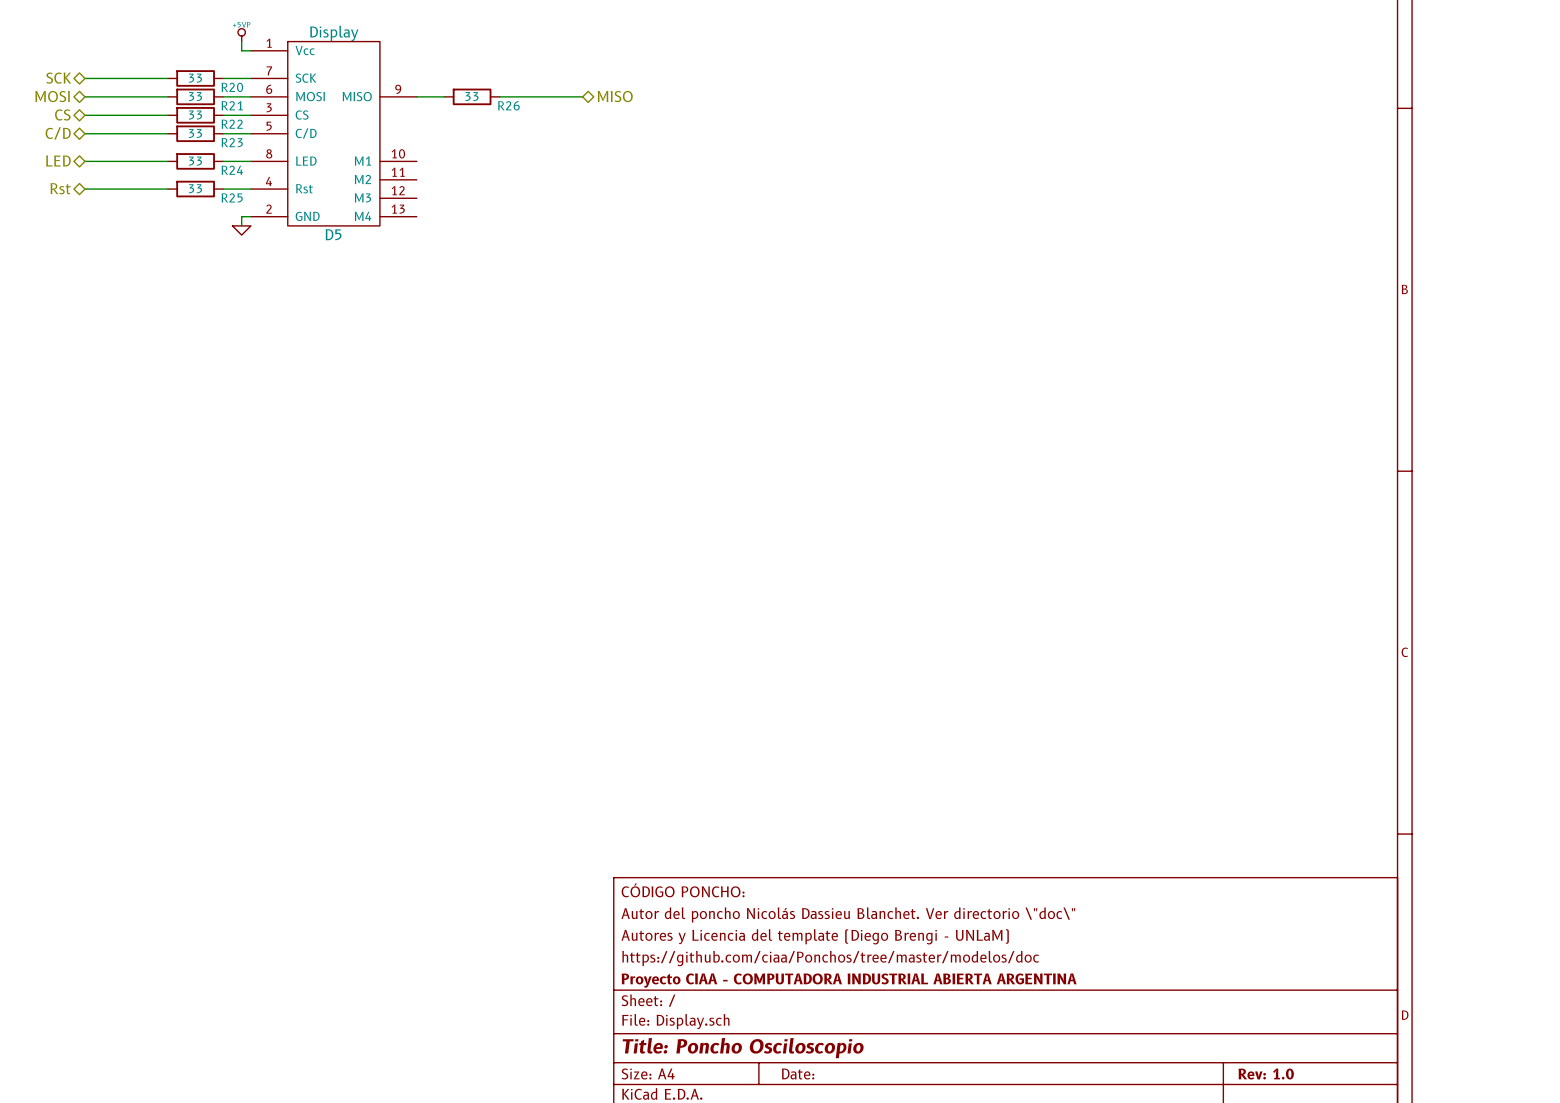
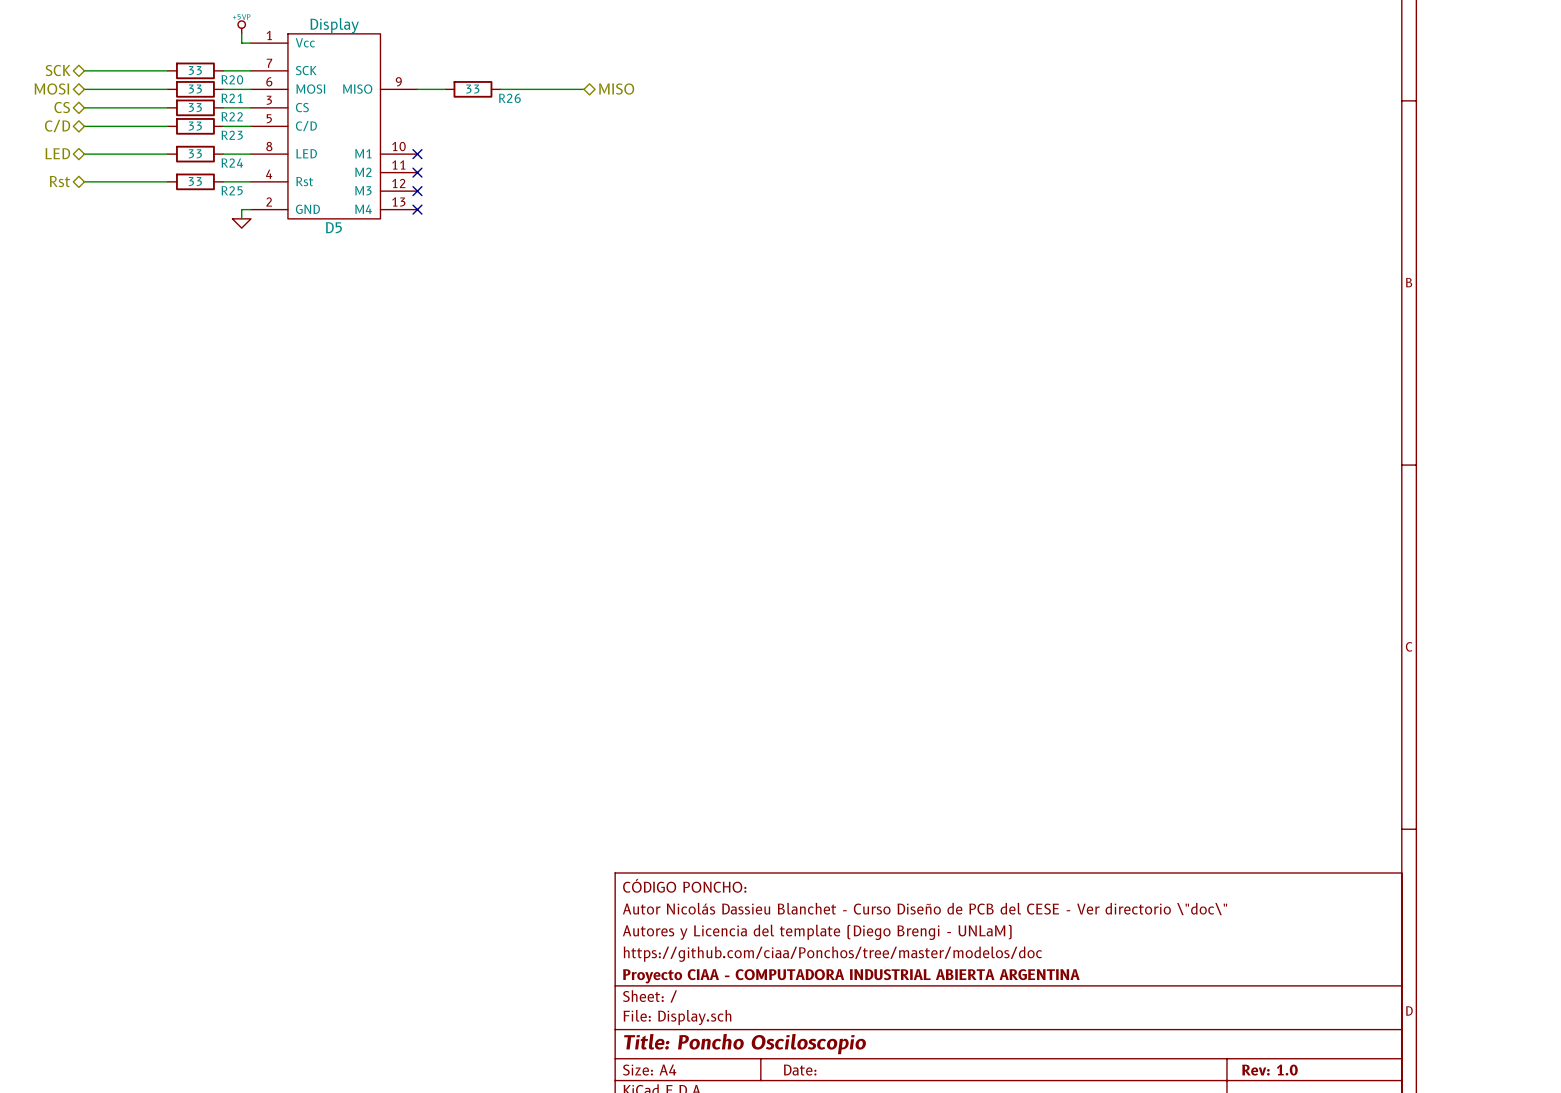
no-connect mark: none -> (417, 154)
no-connect mark: none -> (417, 172)
no-connect mark: none -> (417, 191)
no-connect mark: none -> (417, 209)
title block: Autor del poncho Nicolás Dassieu Blanchet. Ver directorio \"doc\" (848, 914) -> Autor Nicolás Dassieu Blanchet - Curso Diseño de PCB del CESE - Ver directorio \"doc\" (925, 909)

